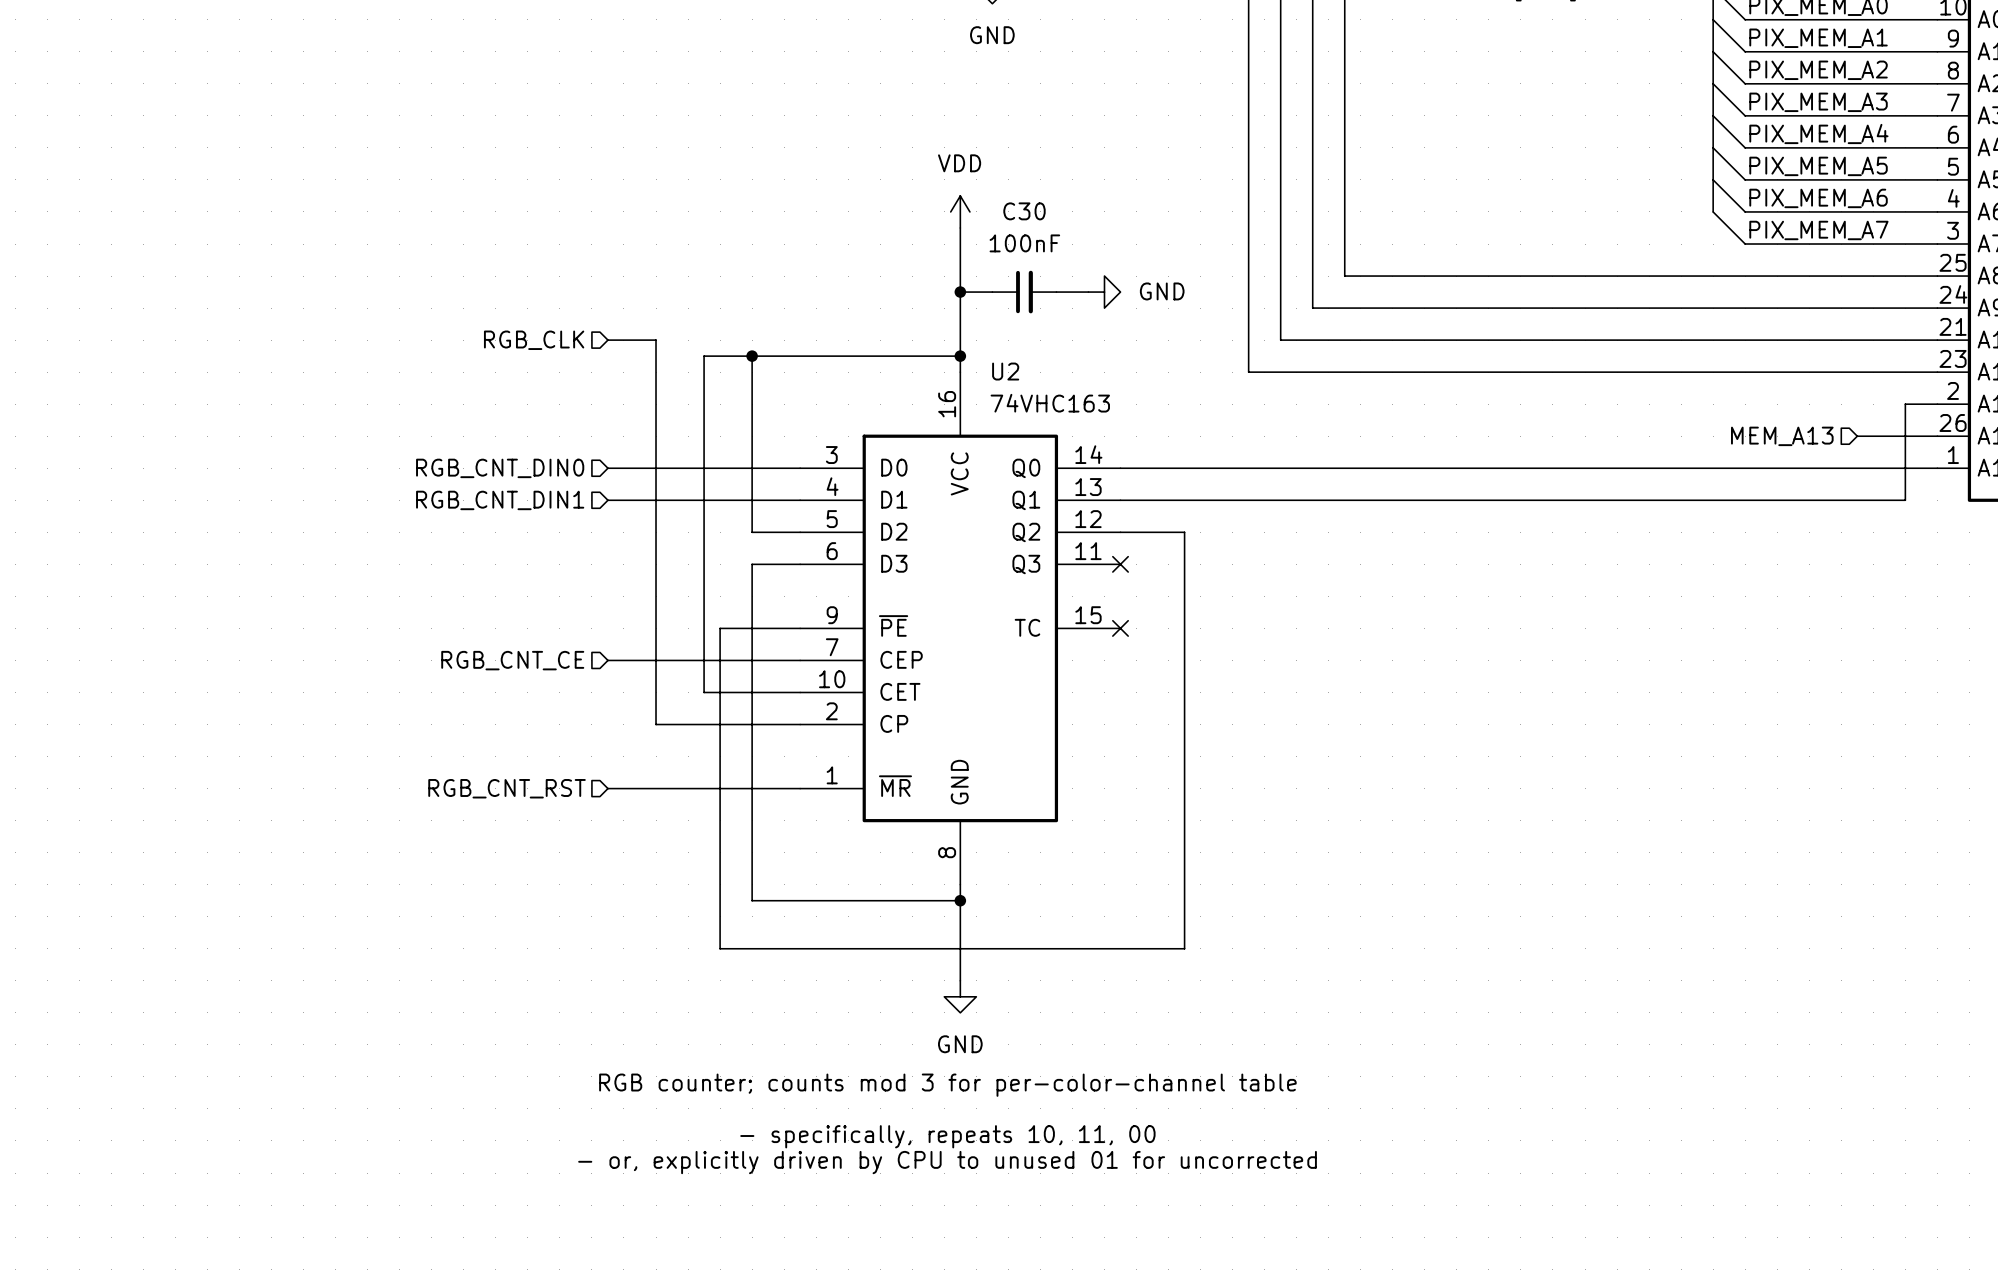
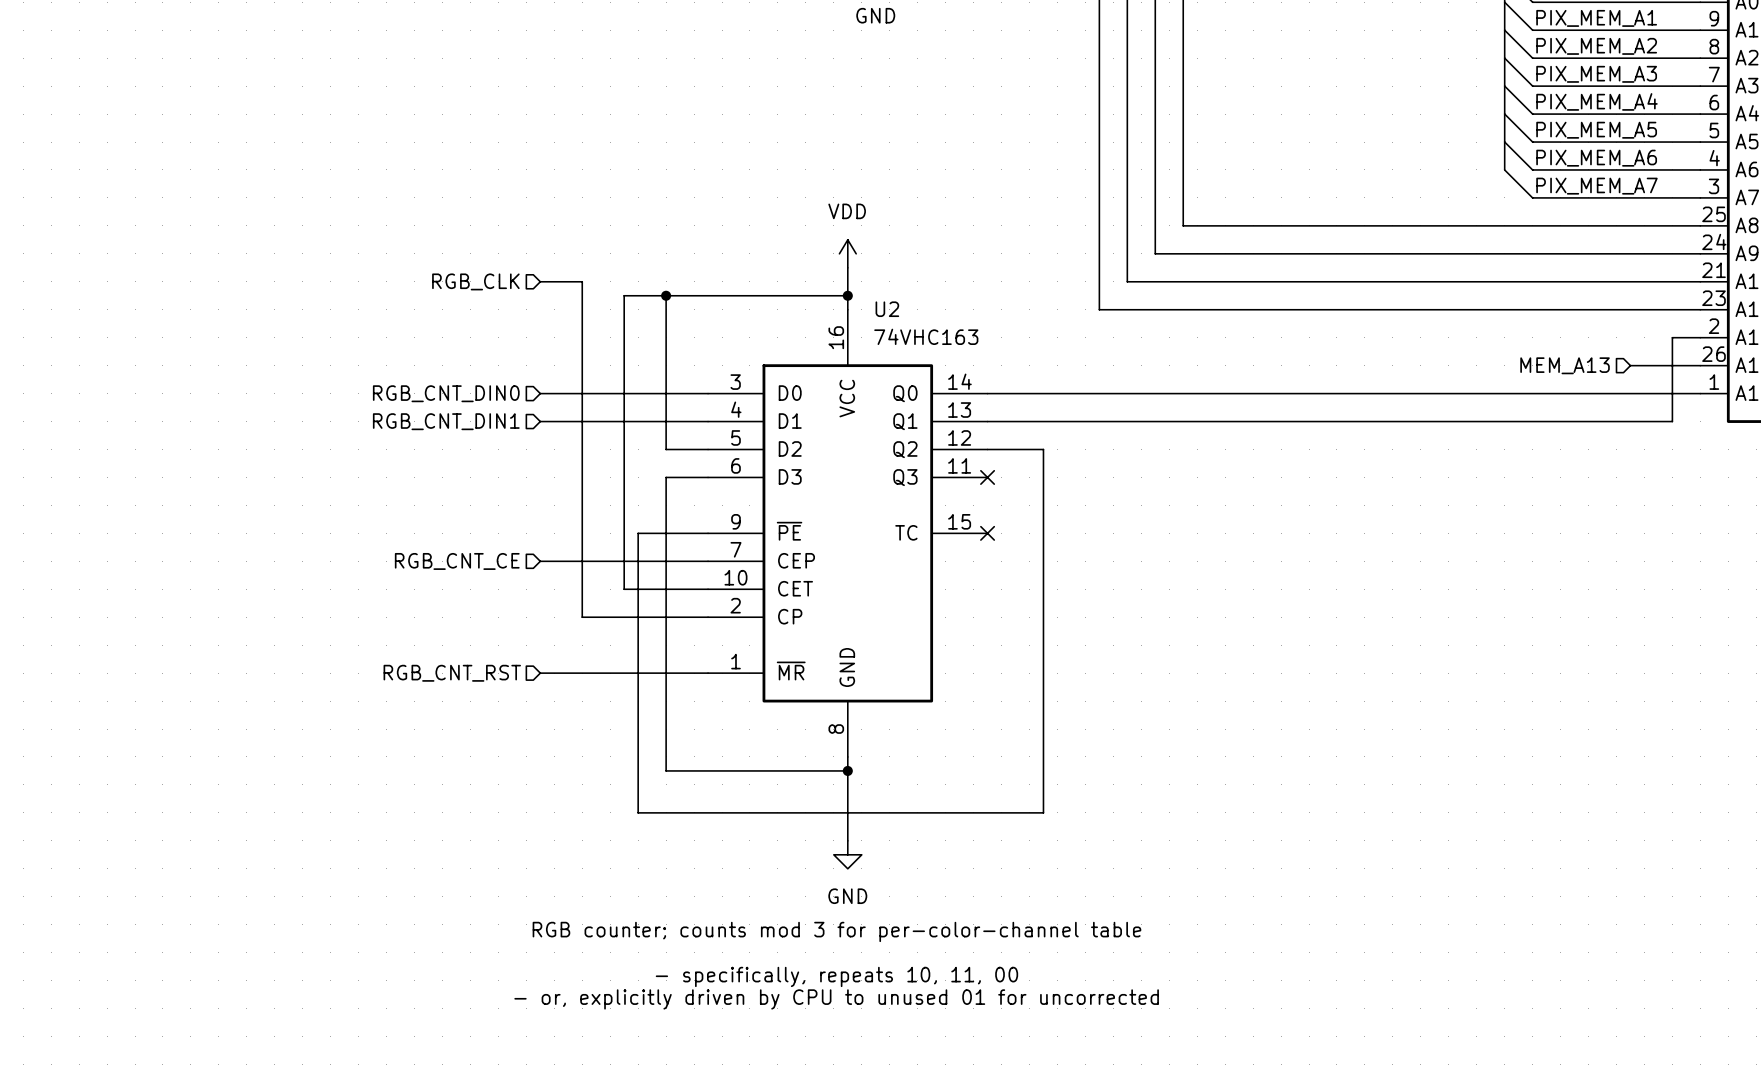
power symbol position: VDD (960, 211) -> VDD (847, 253)
wire: (960, 227) (960, 324) -> none
wire: (960, 292) (992, 292) -> none
junction: (960, 292) -> none
C30: 100nF (1024, 292) -> none
wire: (1056, 292) (1088, 292) -> none
power symbol: GND (1104, 292) -> none

